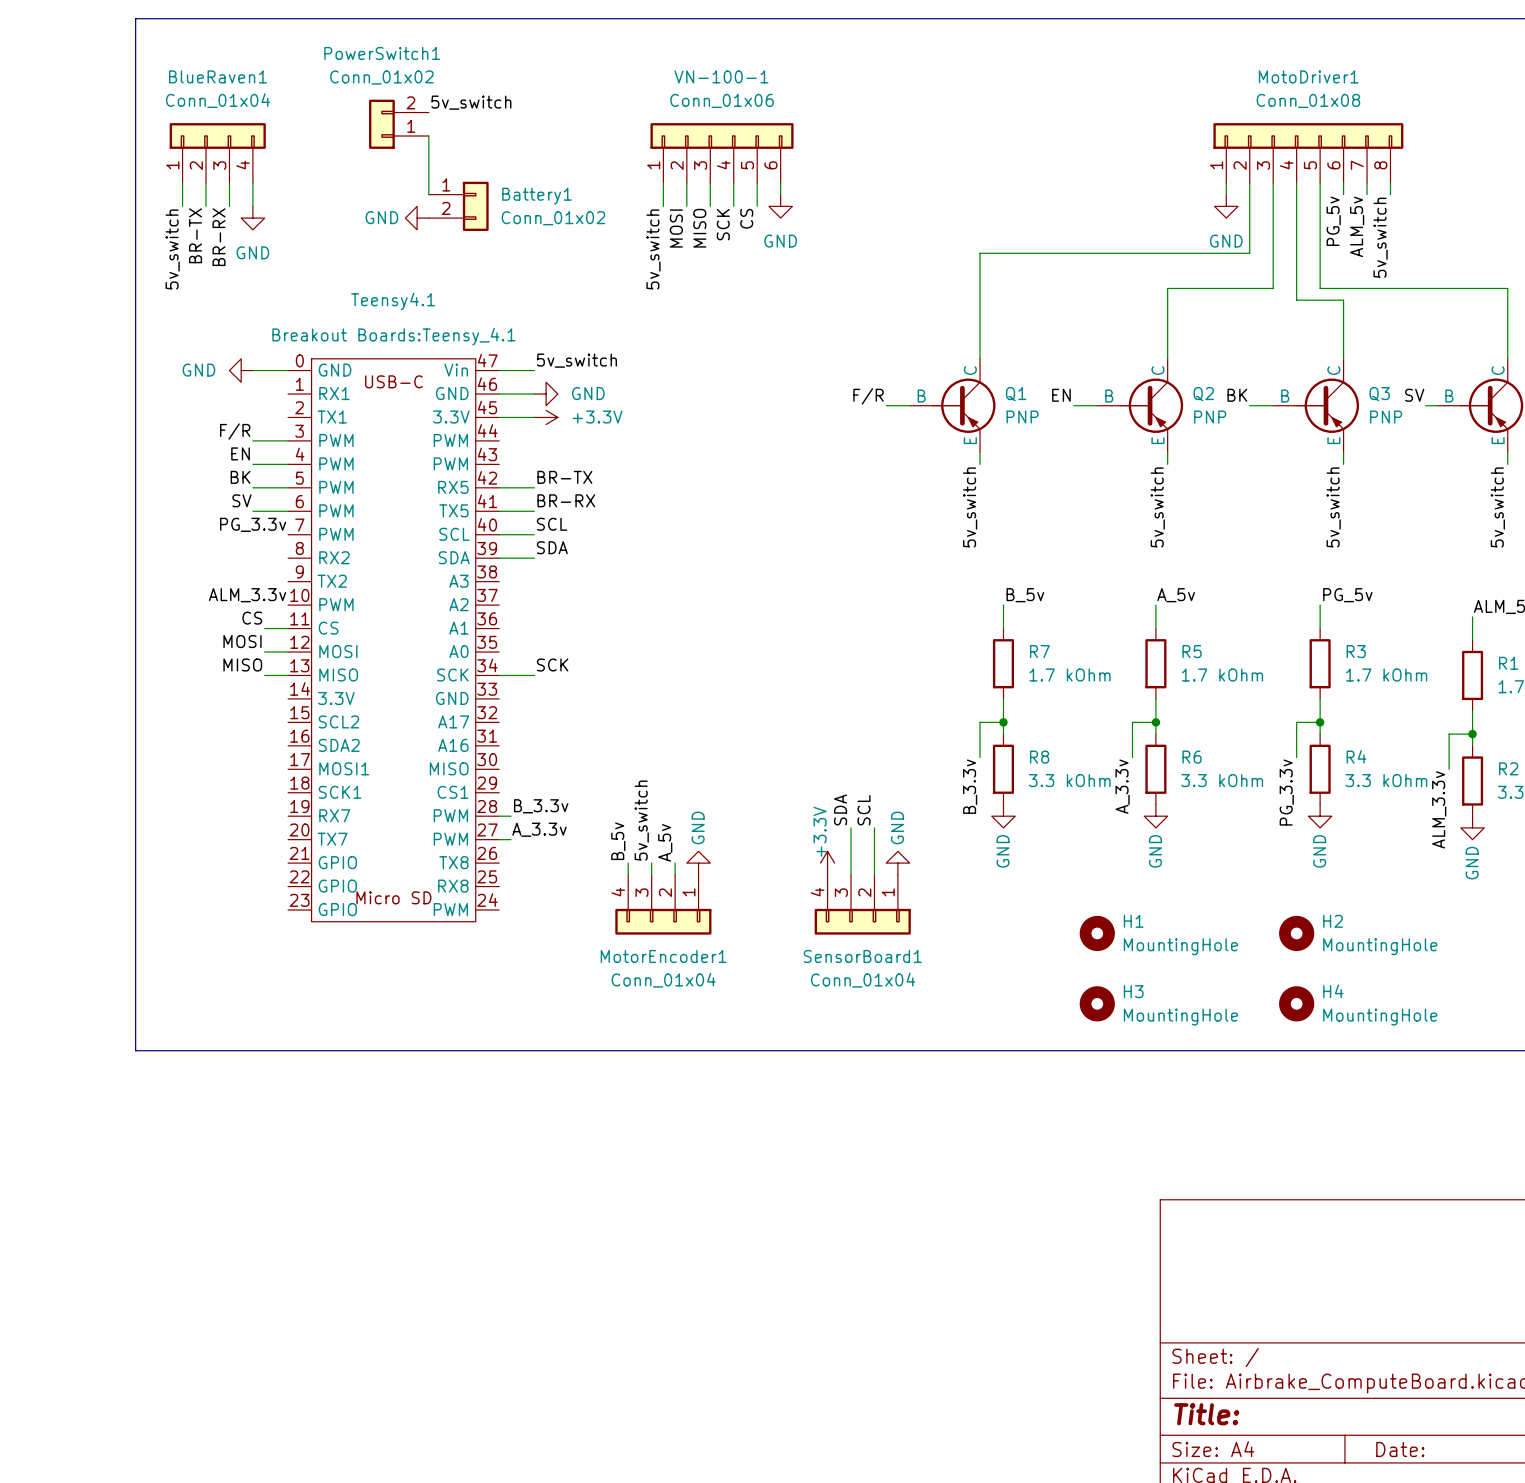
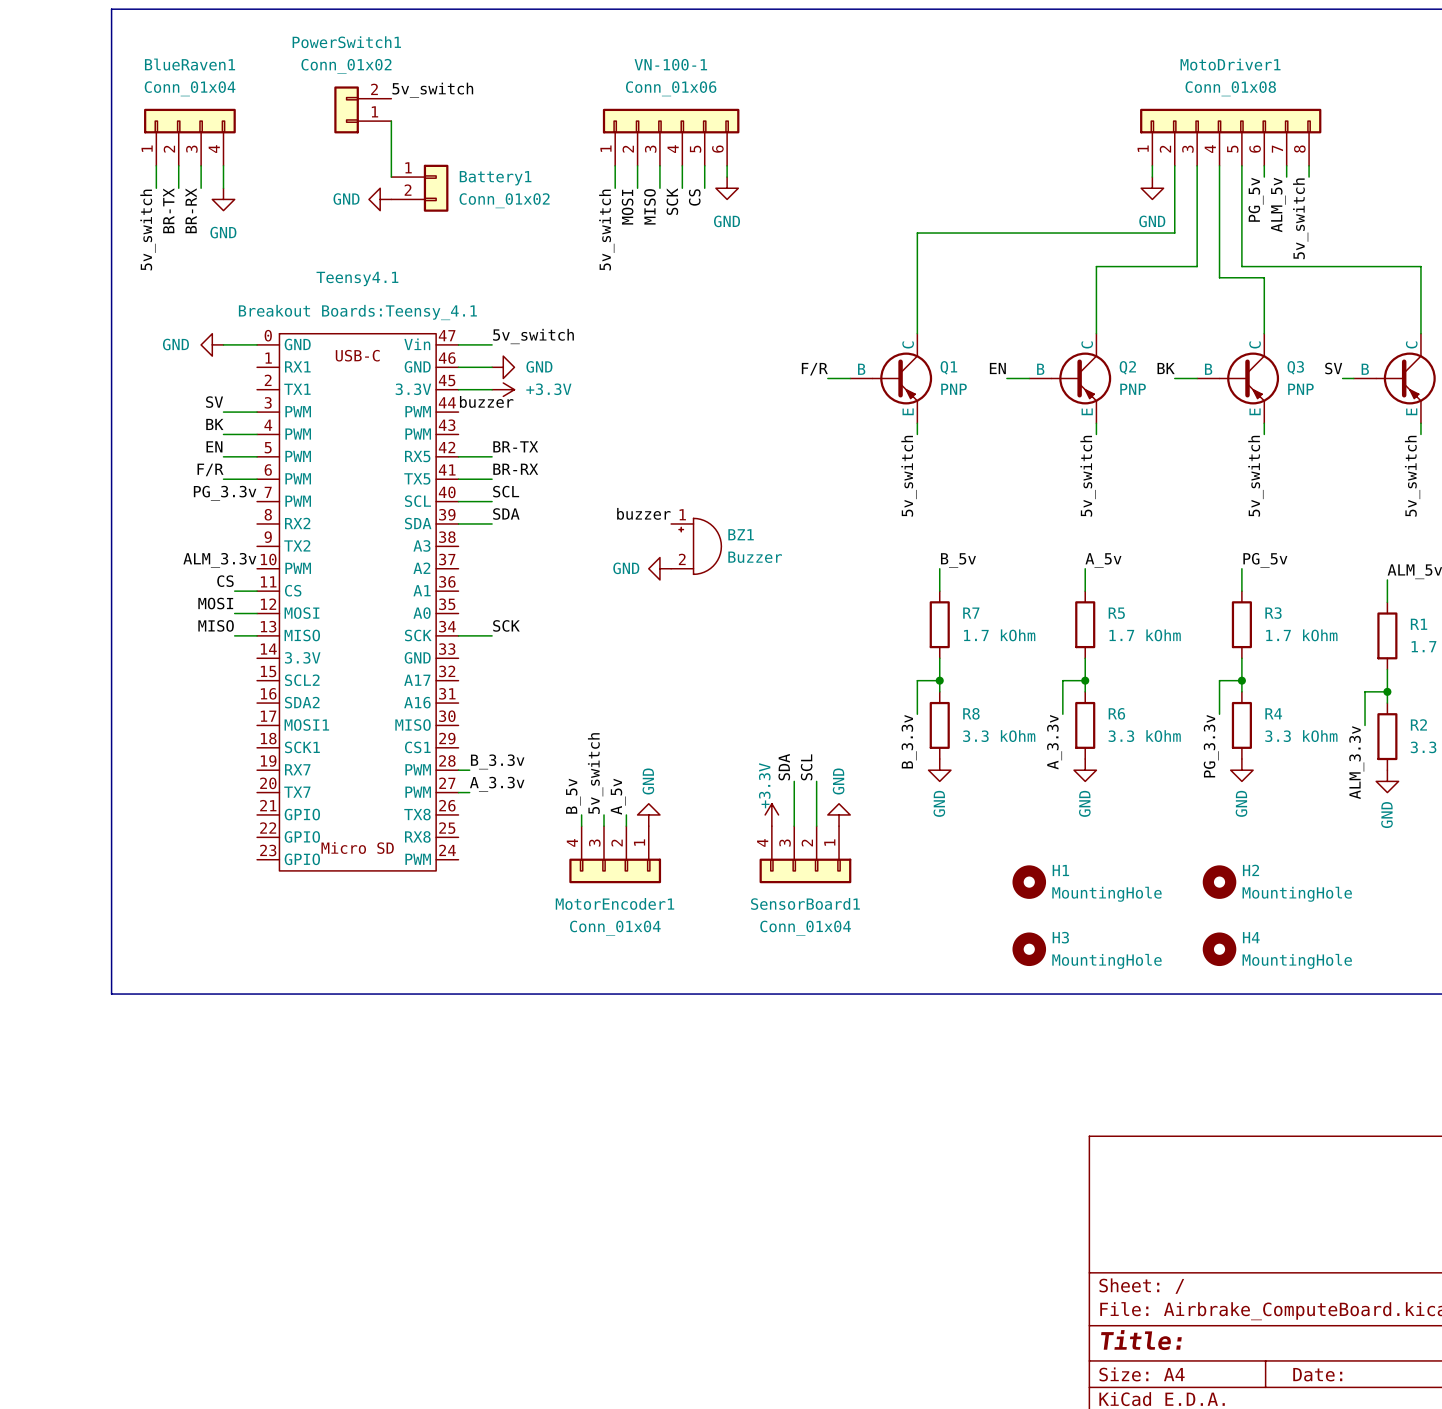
label: none -> buzzer (486, 401)
label: F/R (235, 431) -> SV (214, 402)
label: EN (240, 453) -> BK (214, 424)
label: BK (240, 477) -> EN (214, 446)
label: SV (241, 500) -> F/R (210, 469)
label: none -> buzzer (643, 513)
BZ1: none -> Buzzer (696, 546)
power symbol: none -> GND (659, 568)

